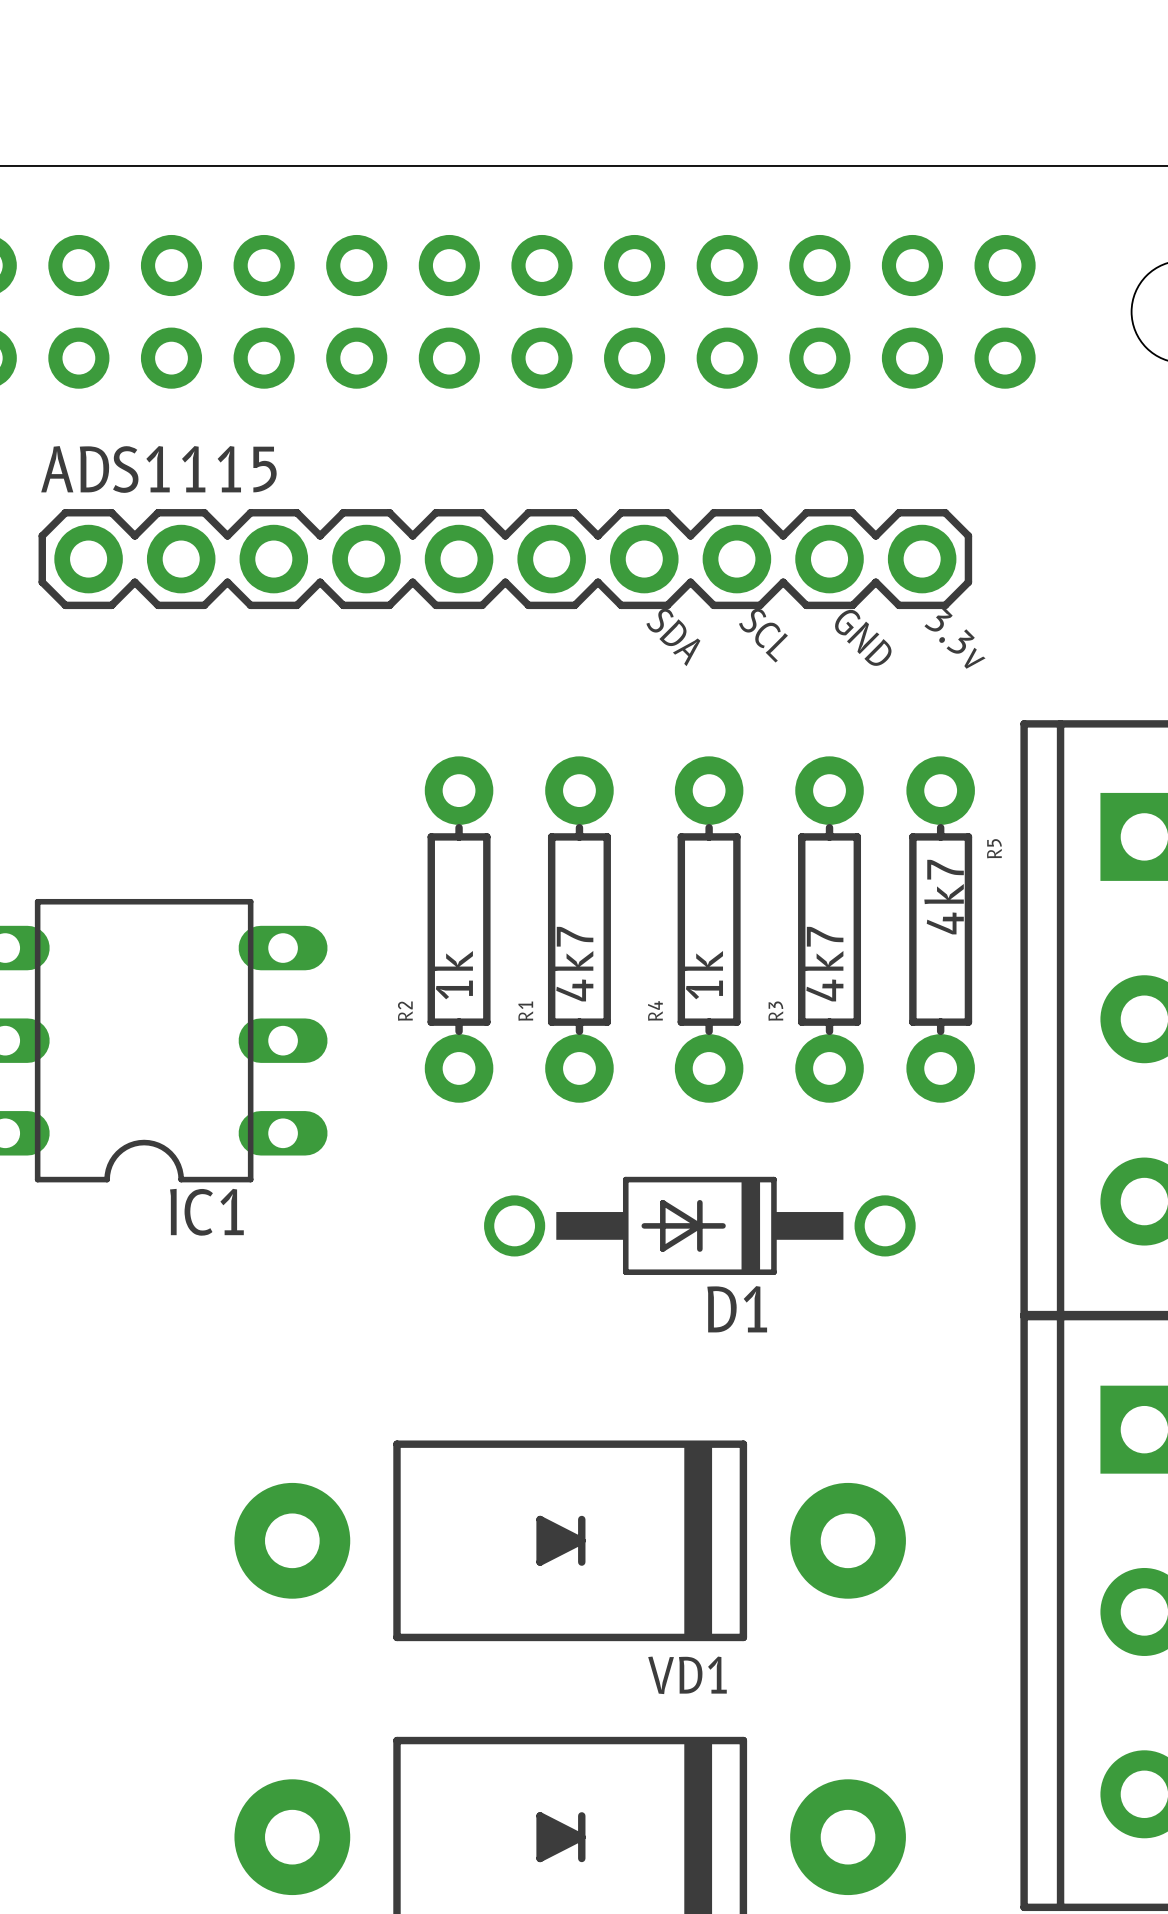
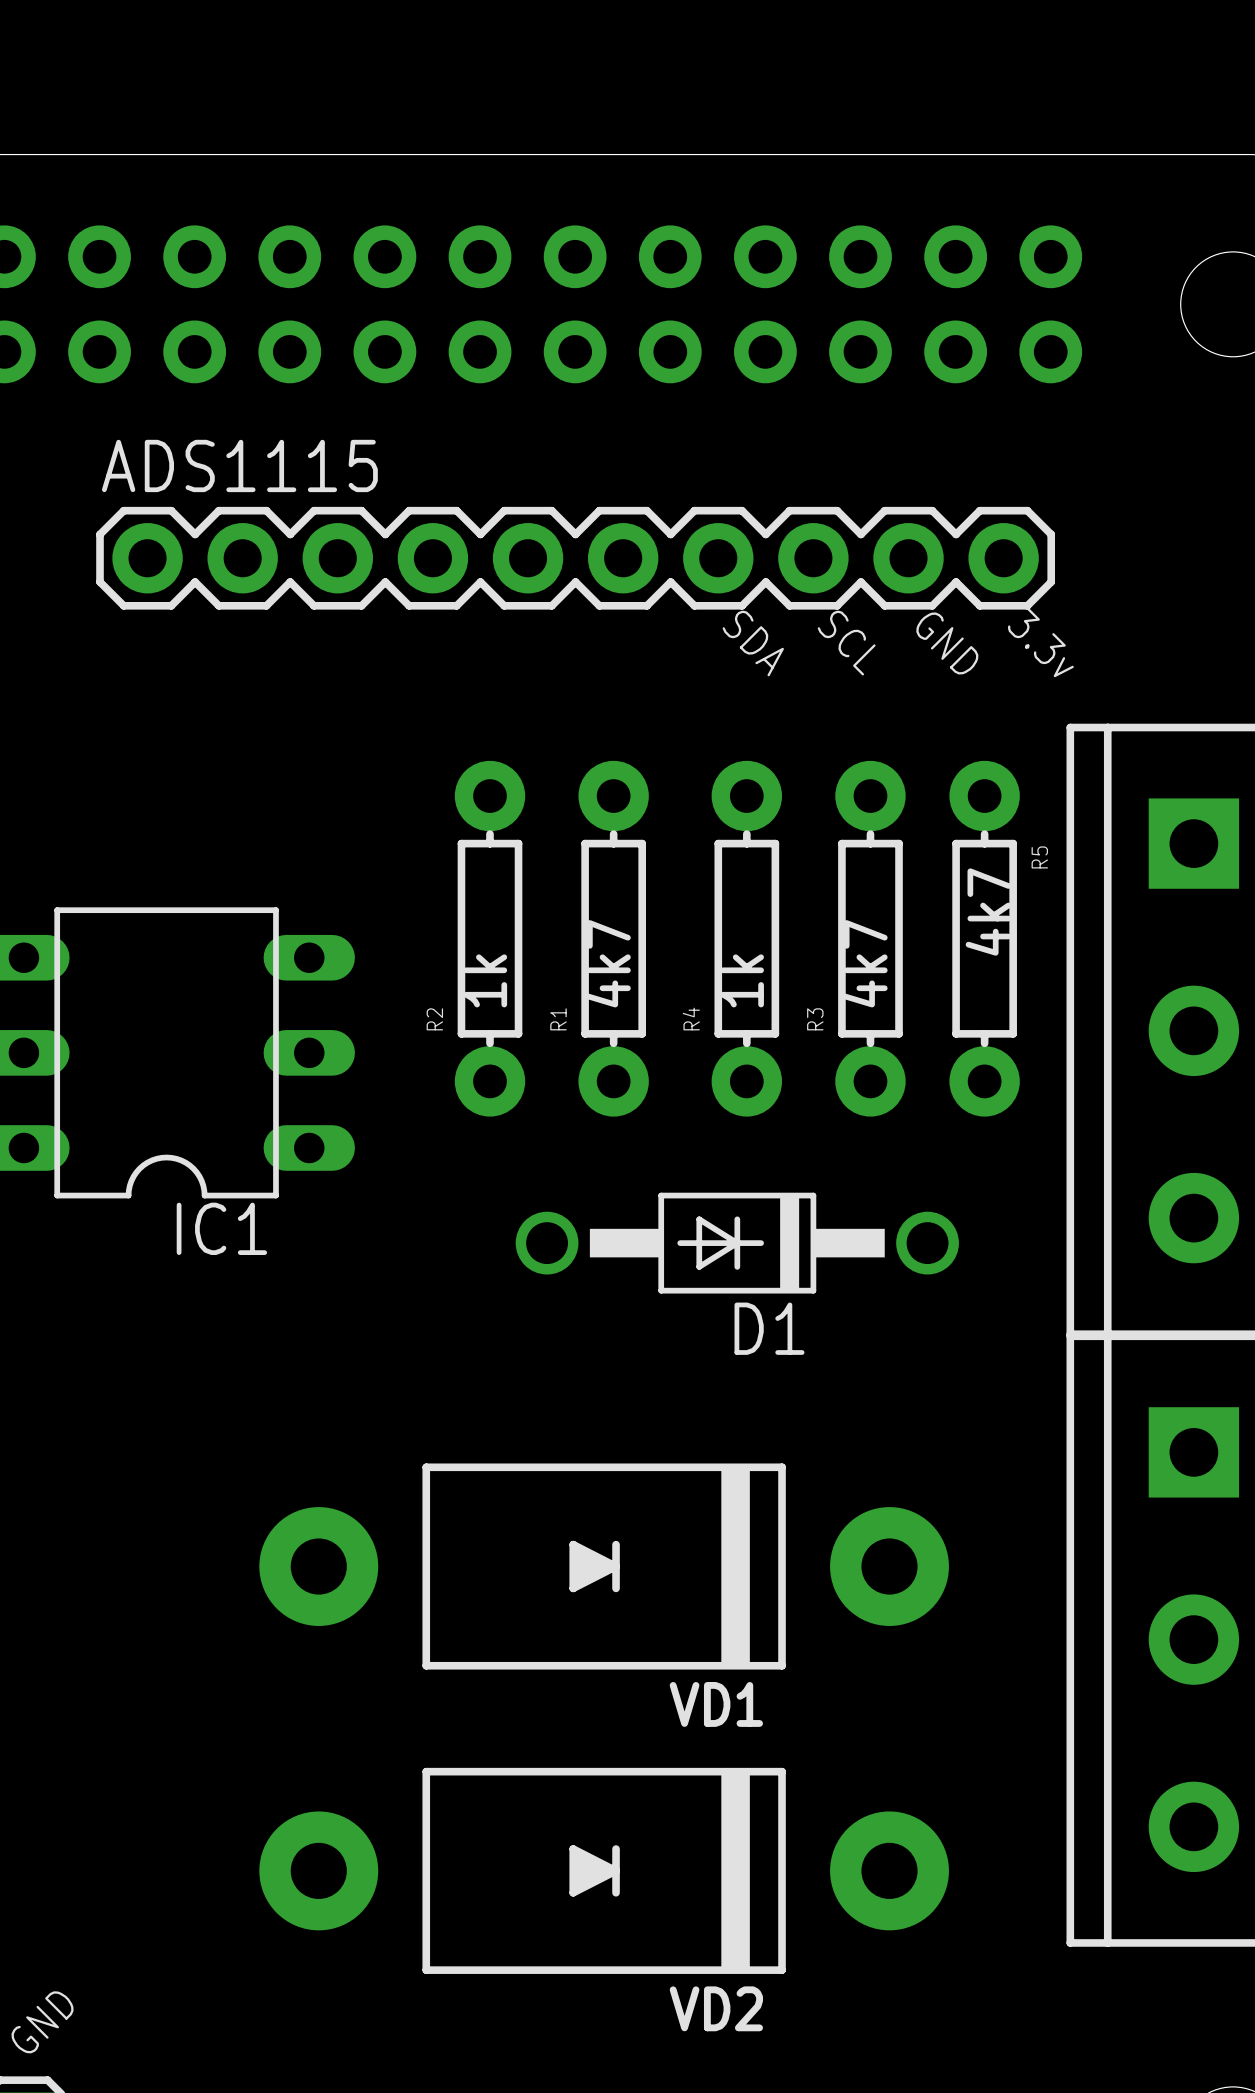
ADS1115 position: (505, 559) -> (575, 558)
text position: SCL (763, 635) -> SCL (846, 643)
text position: SDA (673, 637) -> SDA (753, 643)
text position: GND (863, 637) -> GND (947, 643)
text position: 3.3v (955, 637) -> 3.3v (1040, 642)

